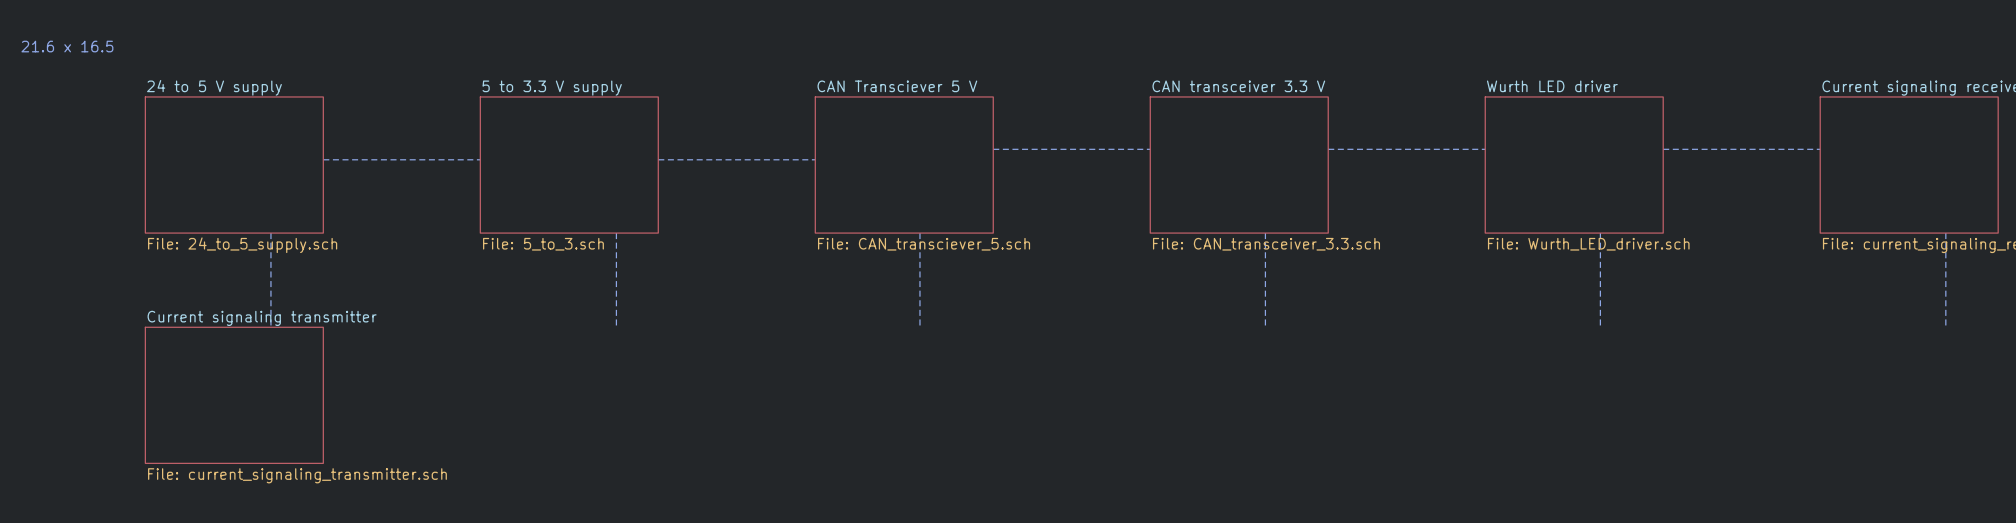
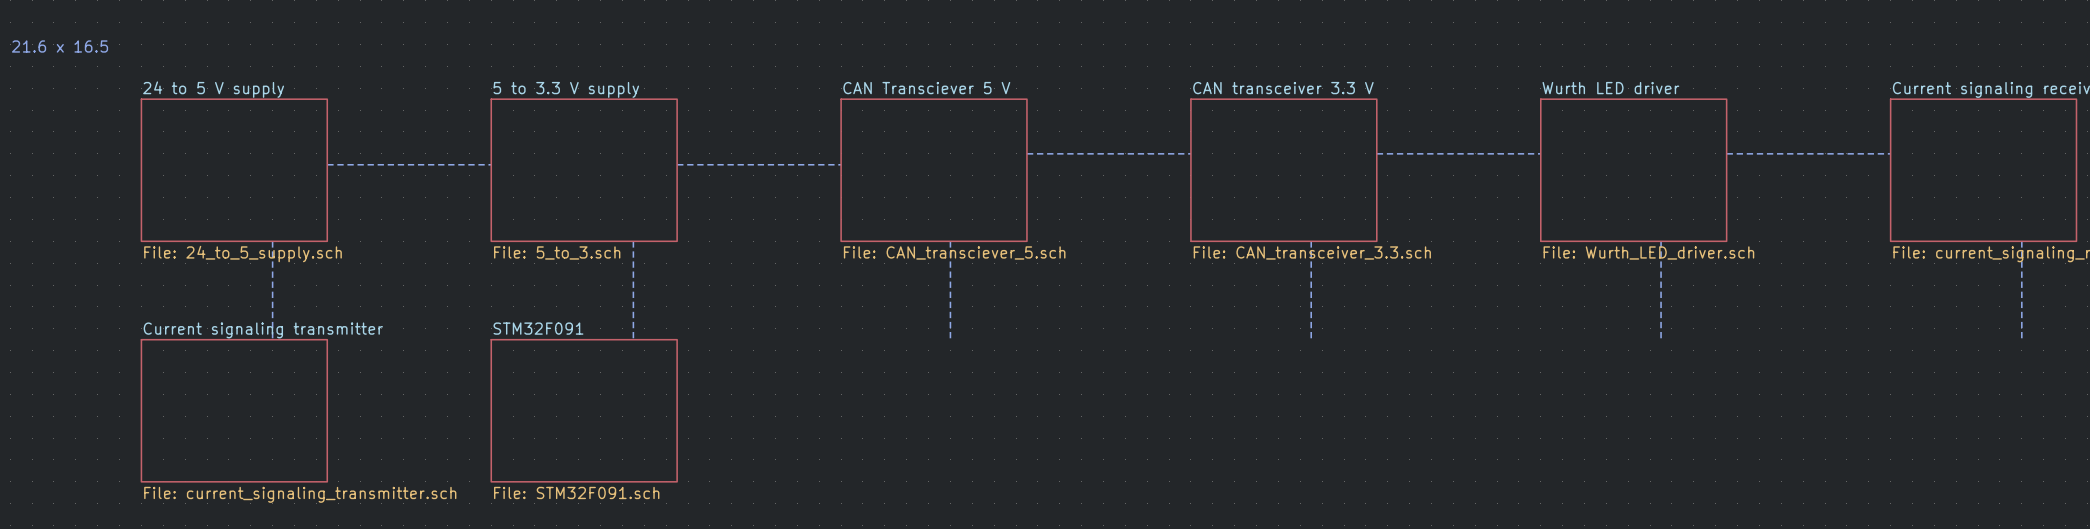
sheet STM32F091: none -> File: STM32F091.sch (584, 410)

